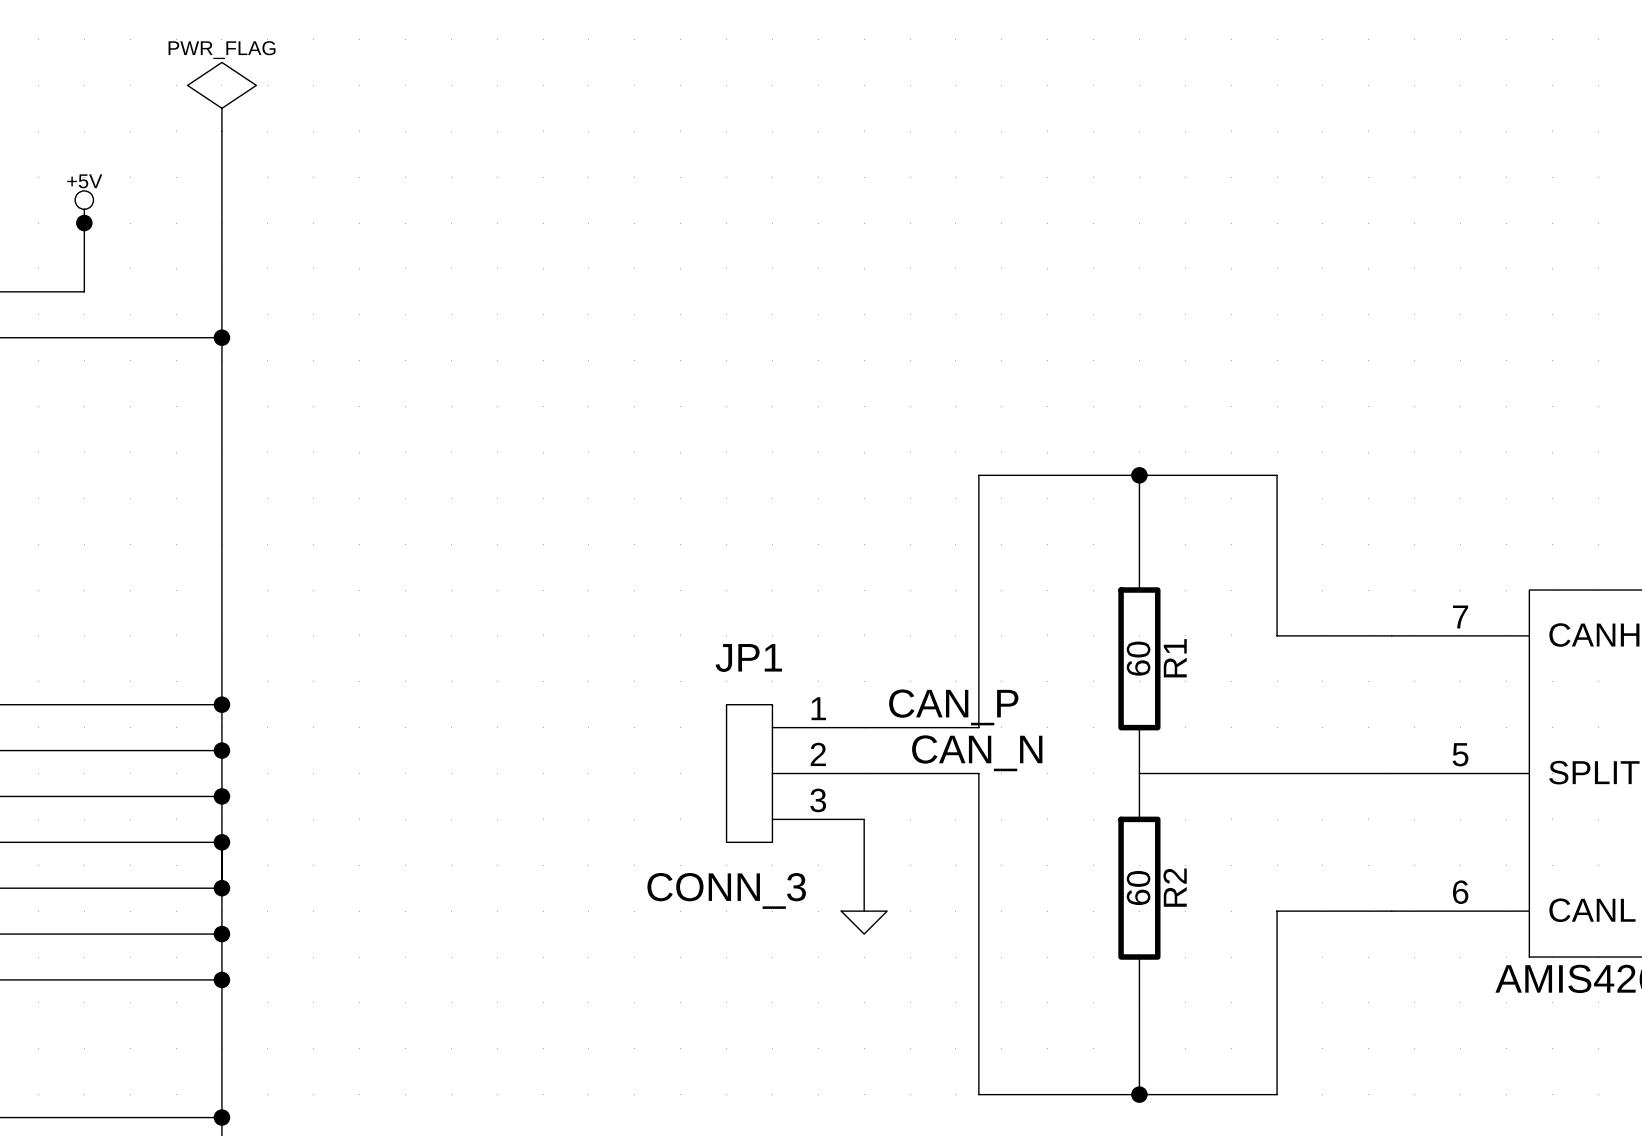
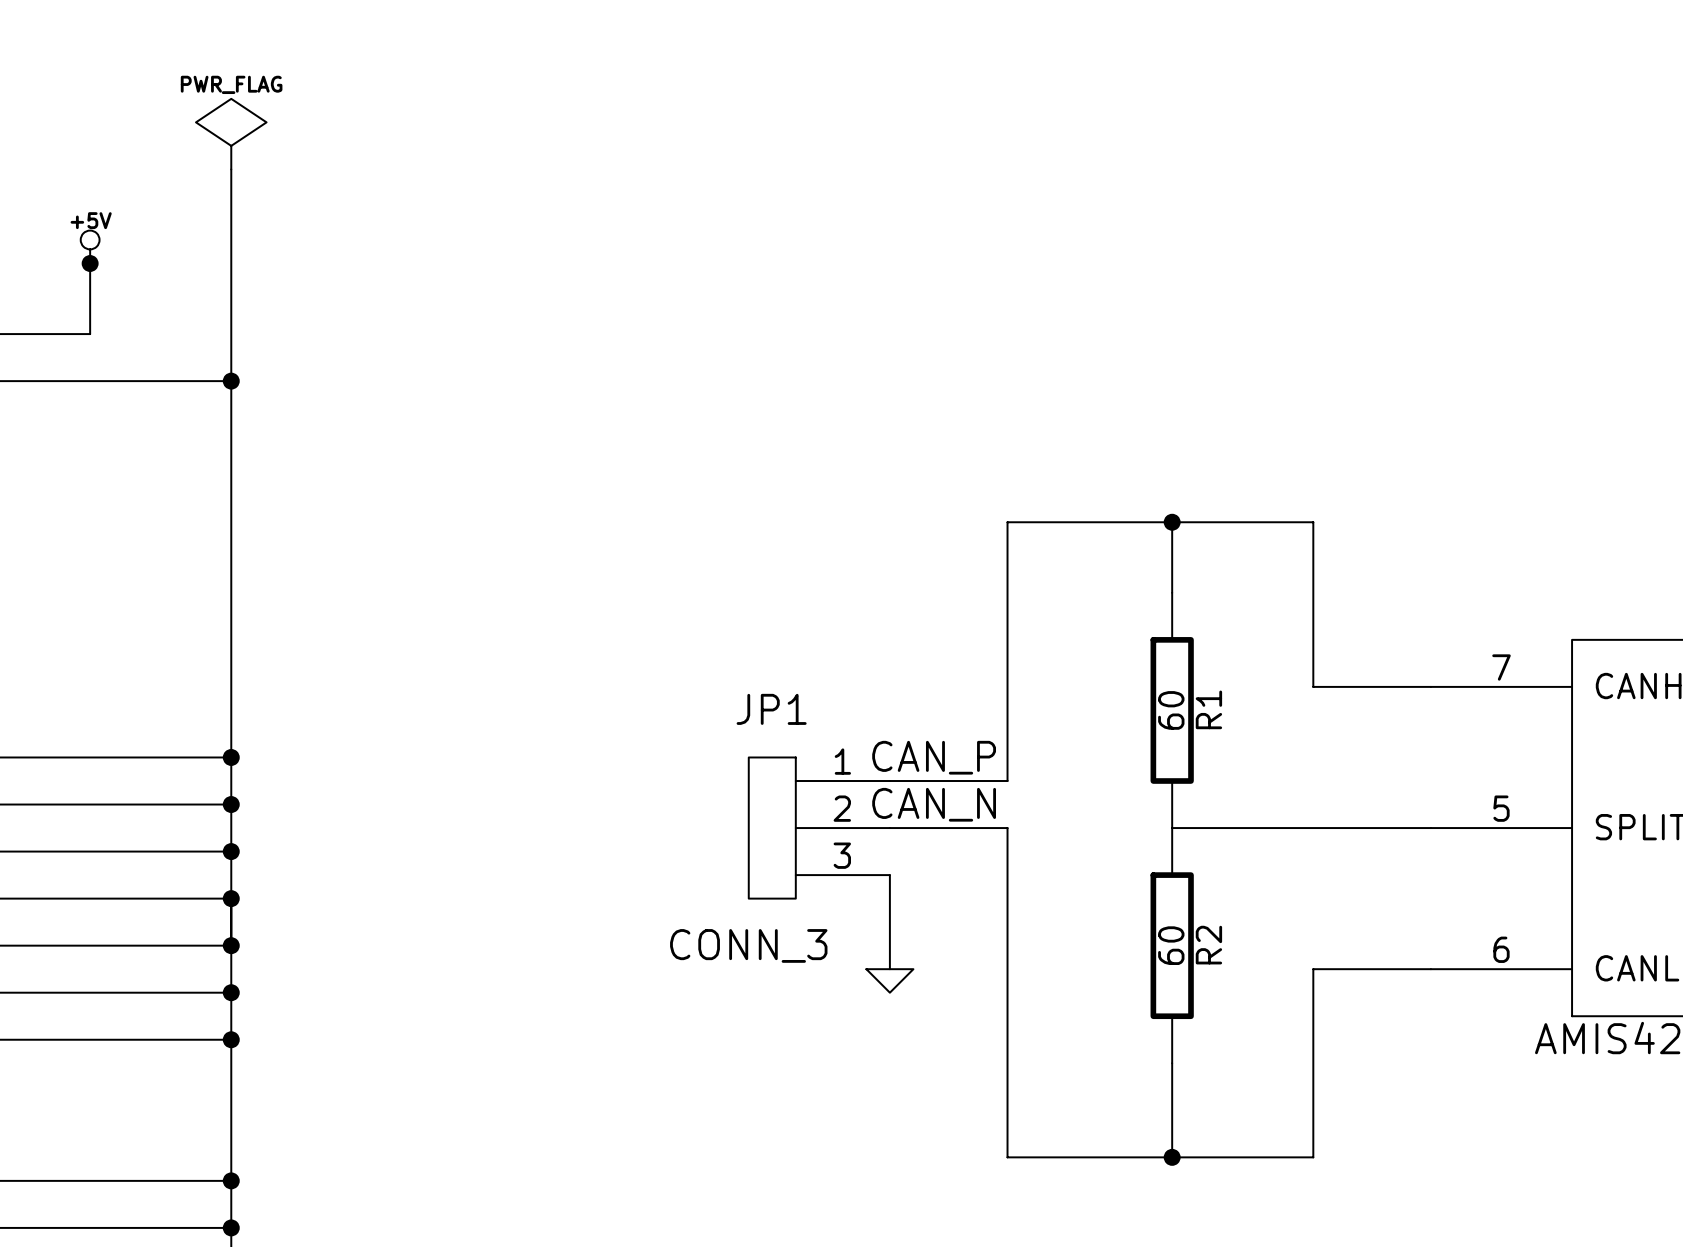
label position: CAN_P (953, 707) -> CAN_P (934, 757)
label position: CAN_N (977, 753) -> CAN_N (934, 804)

